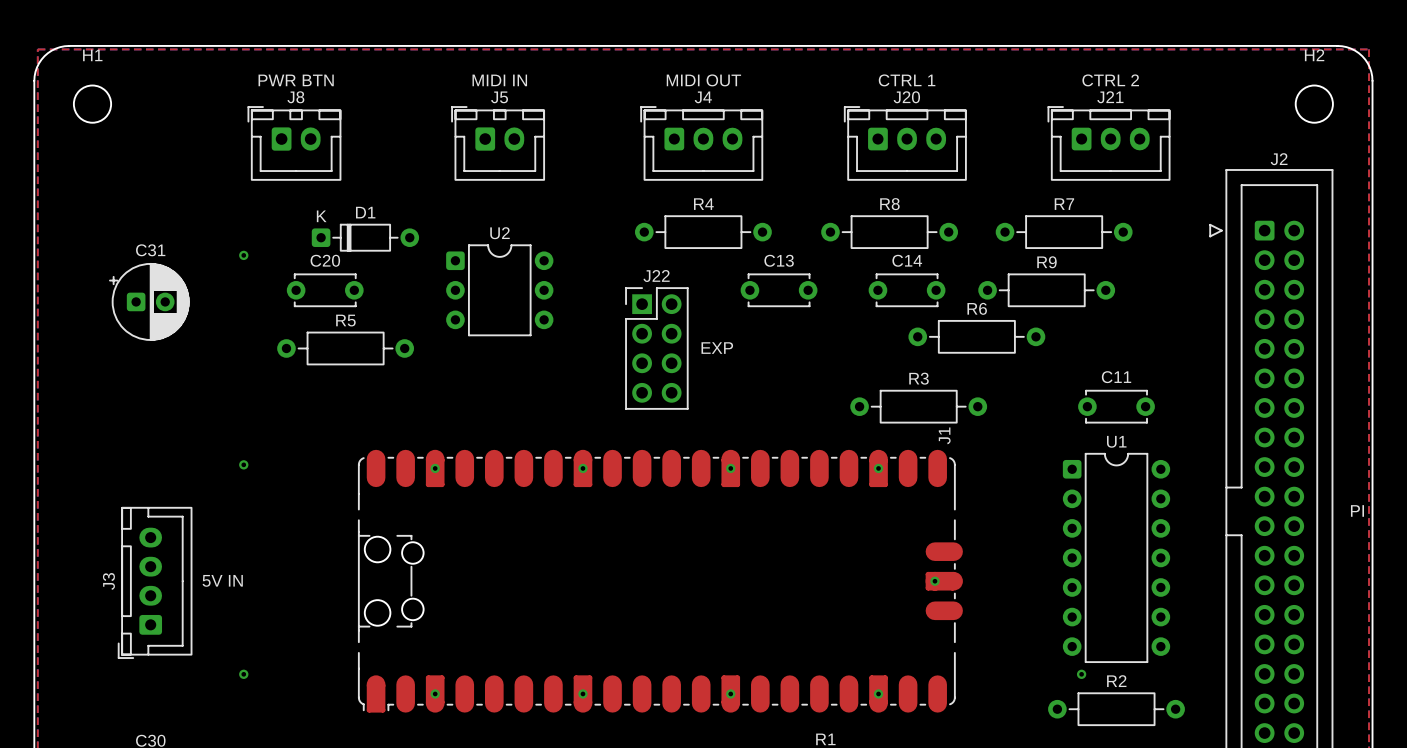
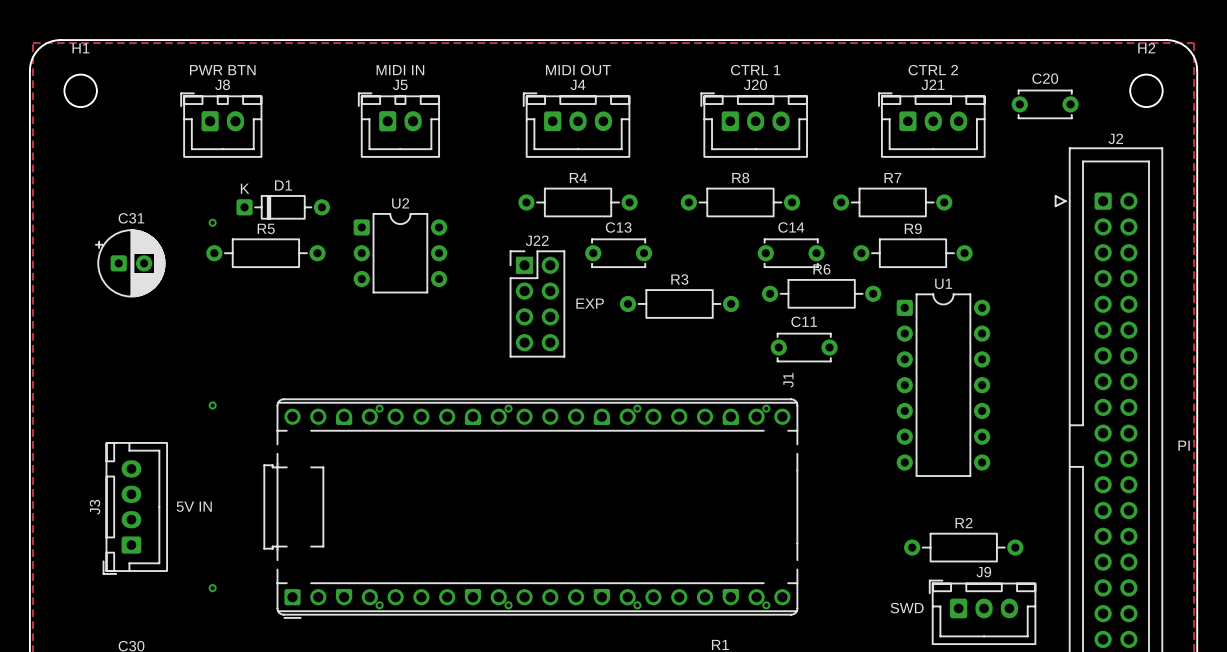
text position: PWR BTN (296, 80) -> PWR BTN (222, 70)
text position: MIDI IN (499, 80) -> MIDI IN (400, 70)
text position: MIDI OUT (703, 80) -> MIDI OUT (578, 70)
text position: CTRL 1 (907, 80) -> CTRL 1 (755, 70)
text position: CTRL 2 (1110, 80) -> CTRL 2 (933, 70)
J8 position: (294, 143) -> (221, 125)
J5 position: (498, 143) -> (398, 125)
J4 position: (701, 143) -> (576, 125)
J20 position: (905, 143) -> (754, 125)
J21 position: (1109, 143) -> (931, 125)
R4 position: (703, 232) -> (578, 202)
R8 position: (889, 232) -> (740, 202)
R7 position: (1064, 232) -> (892, 202)
D1 position: (365, 237) -> (283, 207)
C20 position: (325, 290) -> (1045, 104)
U2 position: (499, 290) -> (400, 253)
C13 position: (779, 290) -> (618, 253)
R6 position: (976, 336) -> (821, 293)
R5 position: (345, 348) -> (265, 253)
J22 position: (656, 348) -> (537, 303)
text position: EXP (717, 348) -> EXP (590, 303)
R3 position: (918, 406) -> (679, 303)
C11 position: (1116, 406) -> (804, 347)
J1 footprint: [358, 449, 963, 713] -> [263, 398, 798, 619]
U1 position: (1116, 557) -> (943, 385)
via: (934, 581) -> none
via: (1081, 674) -> none
text: none -> SWD (907, 608)
J9: none -> (982, 612)
R2 position: (1116, 709) -> (963, 547)

